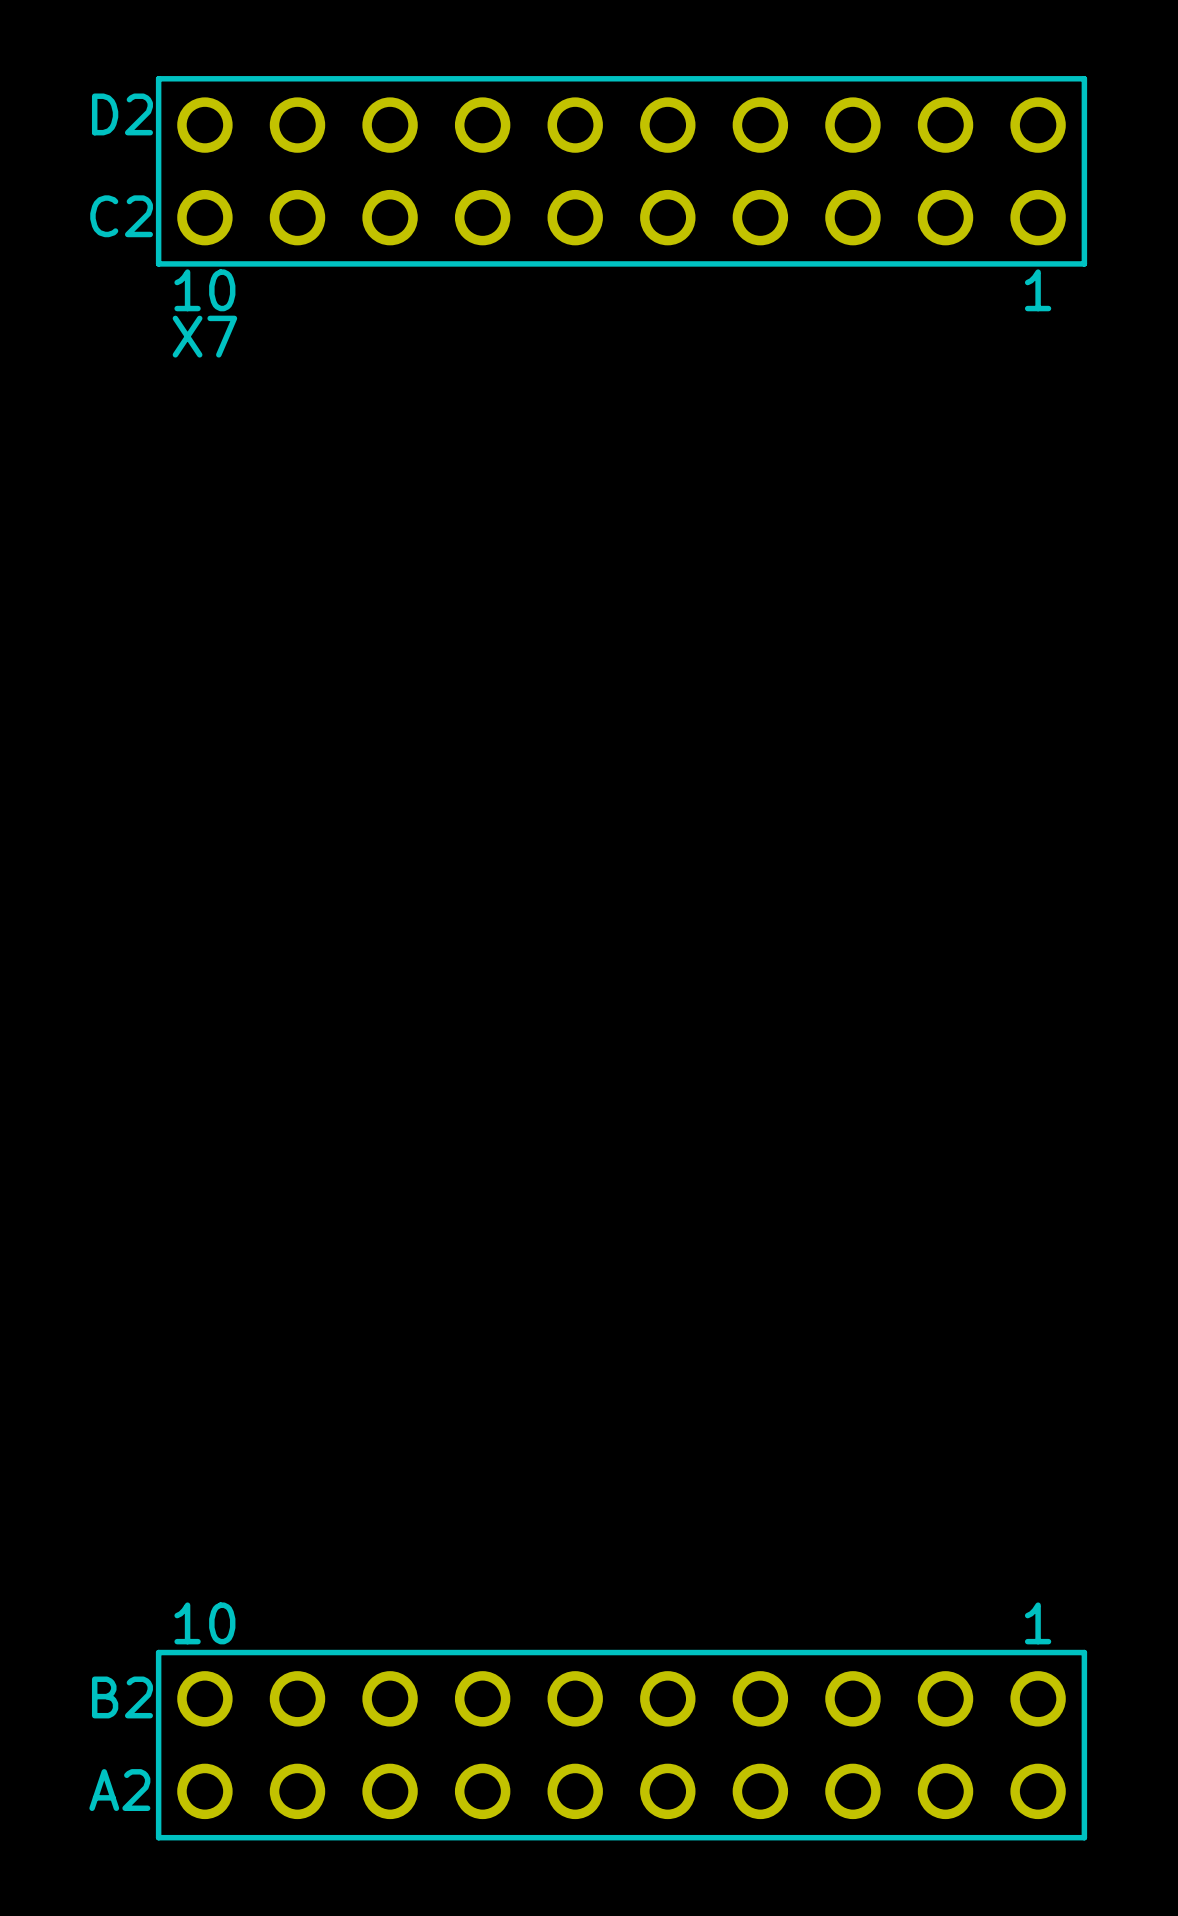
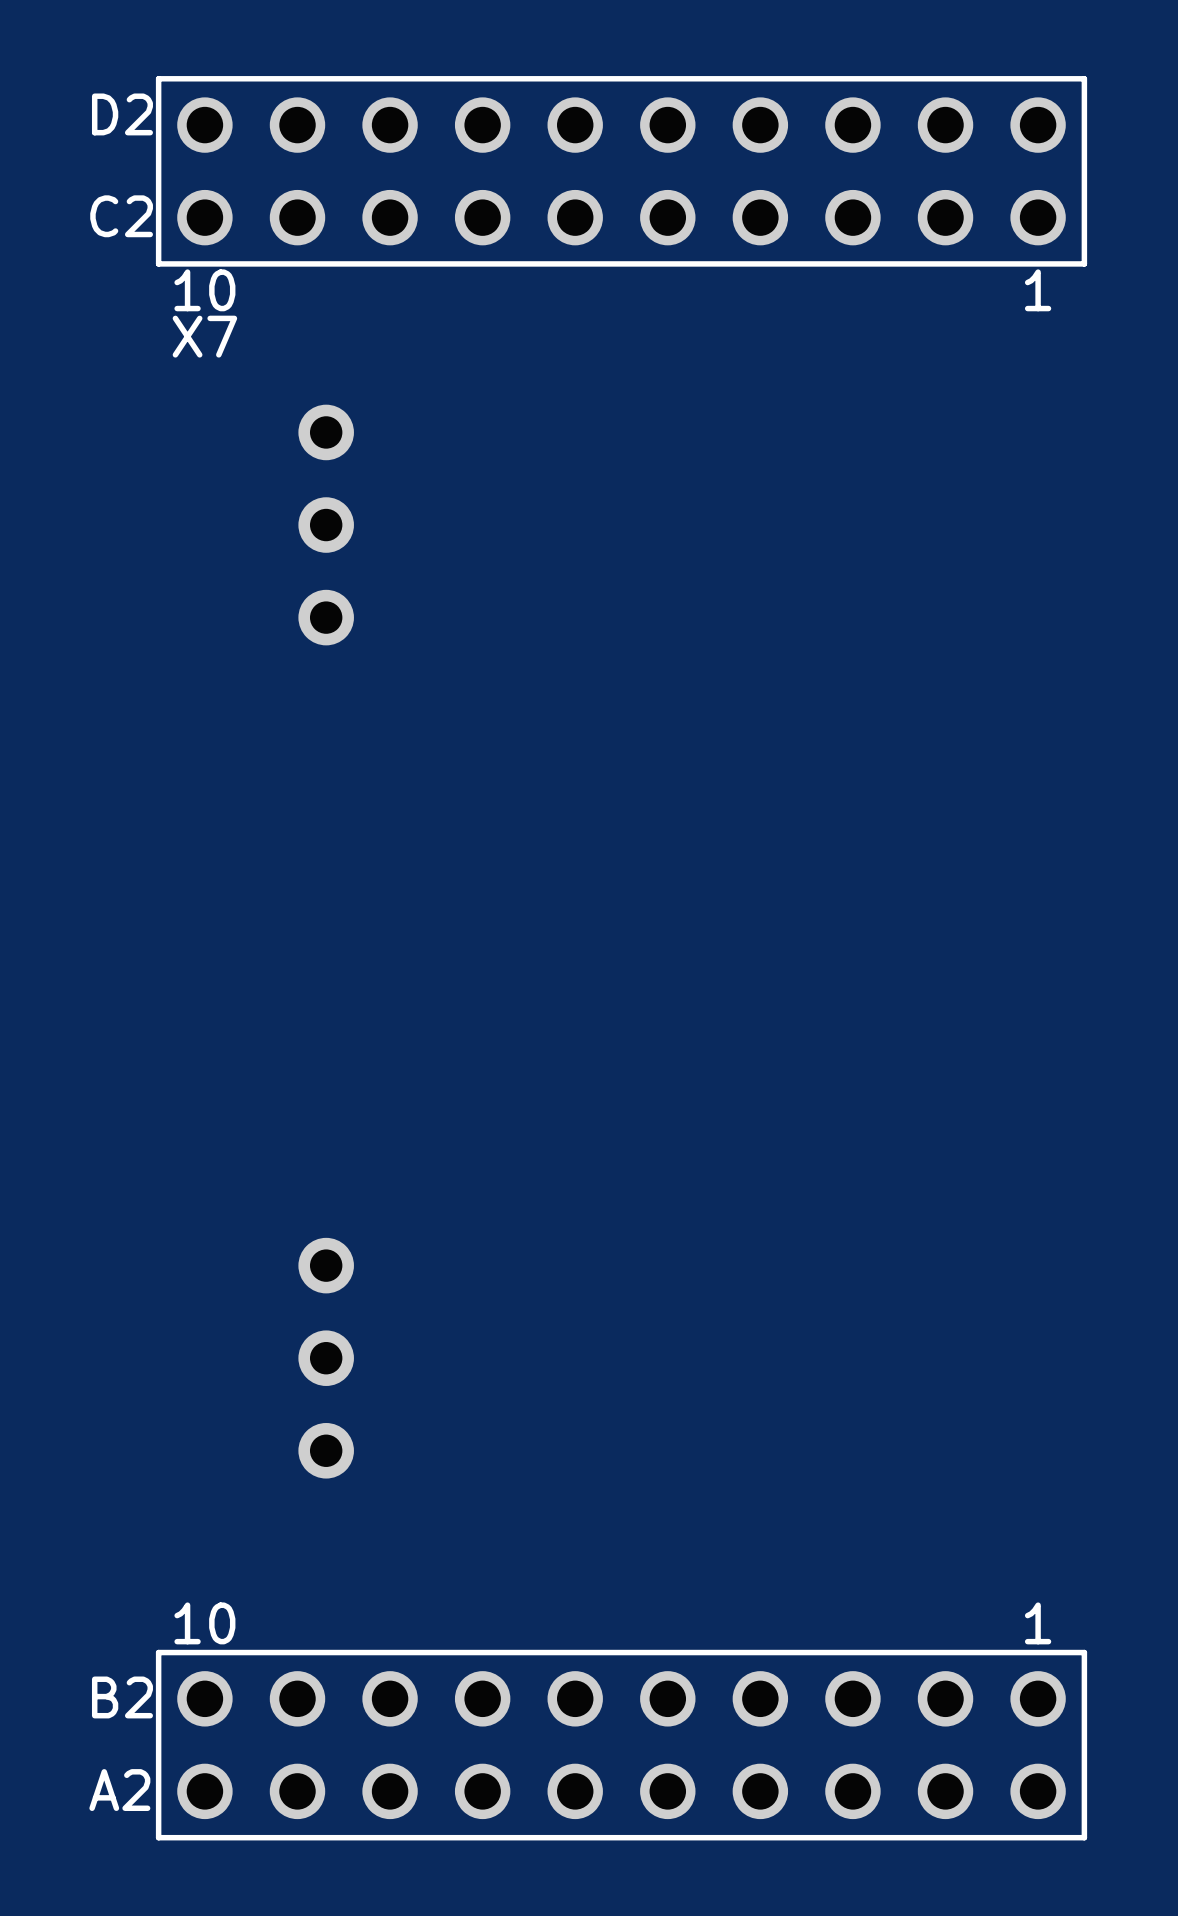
part: none -> (326, 525)
part: none -> (326, 1358)

